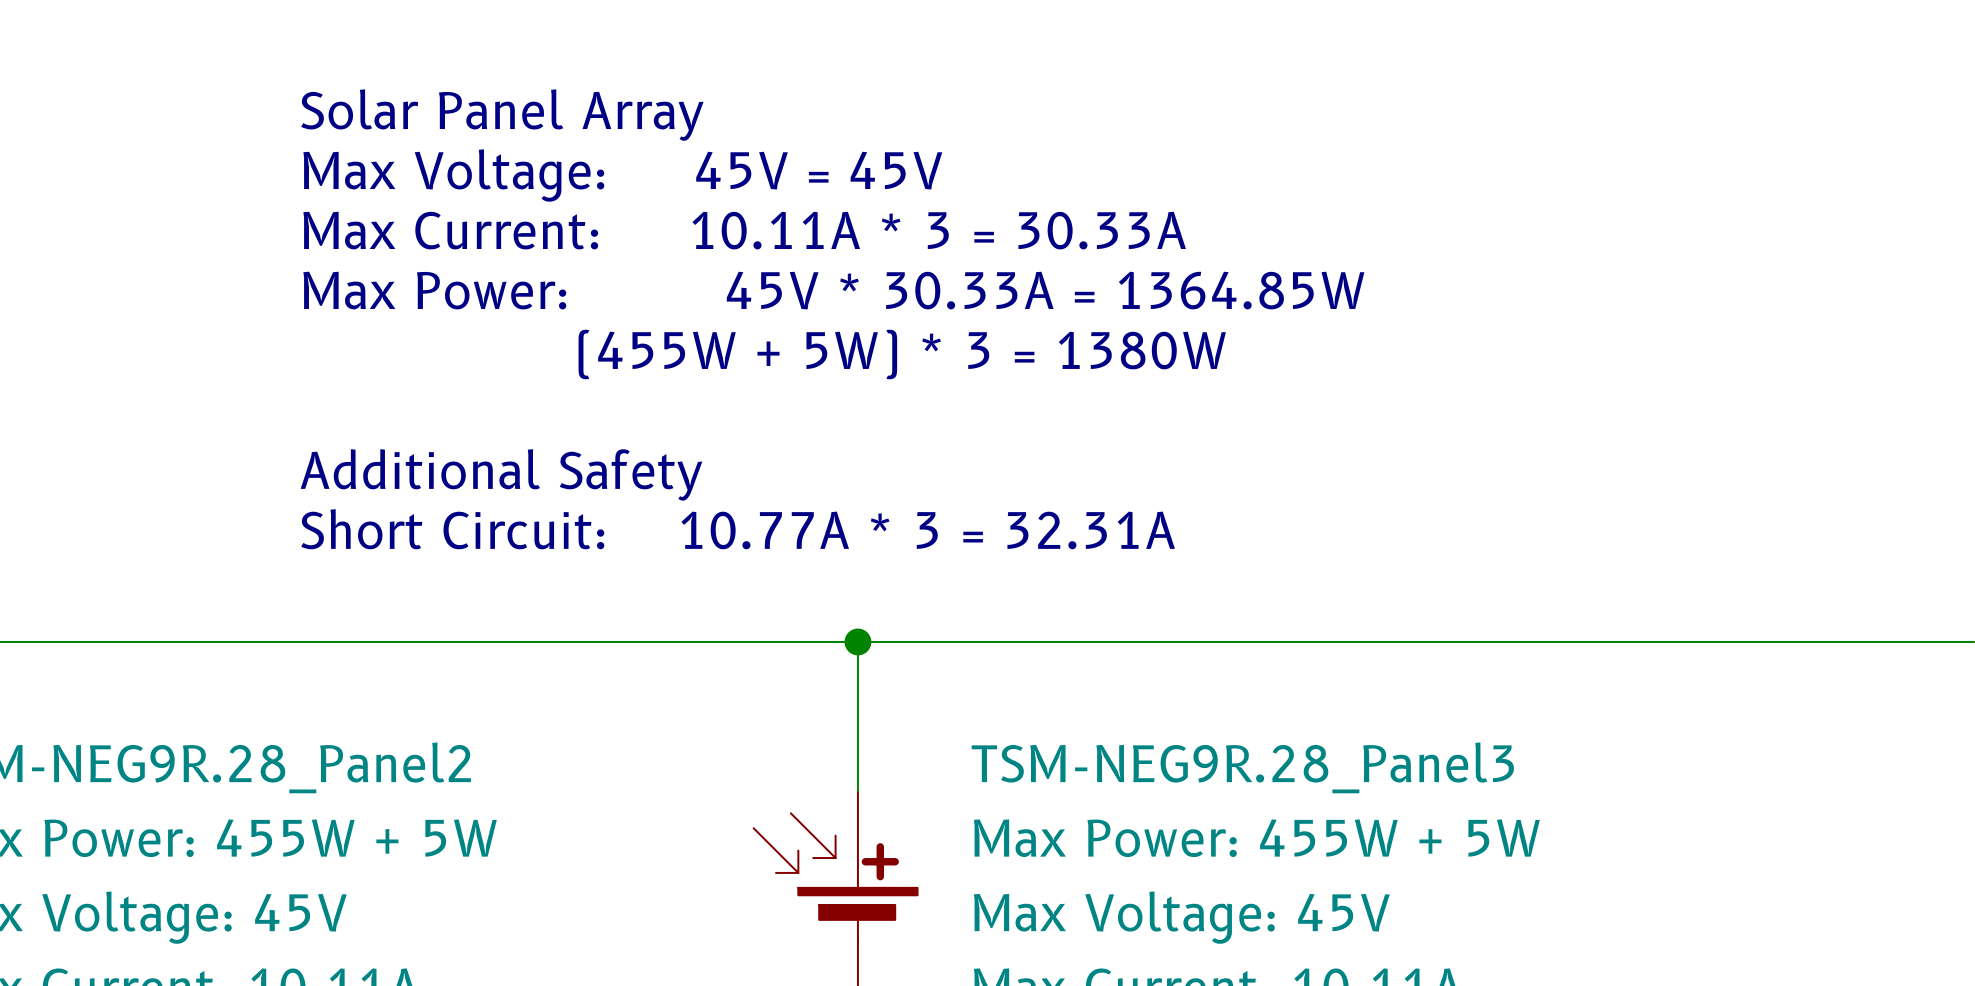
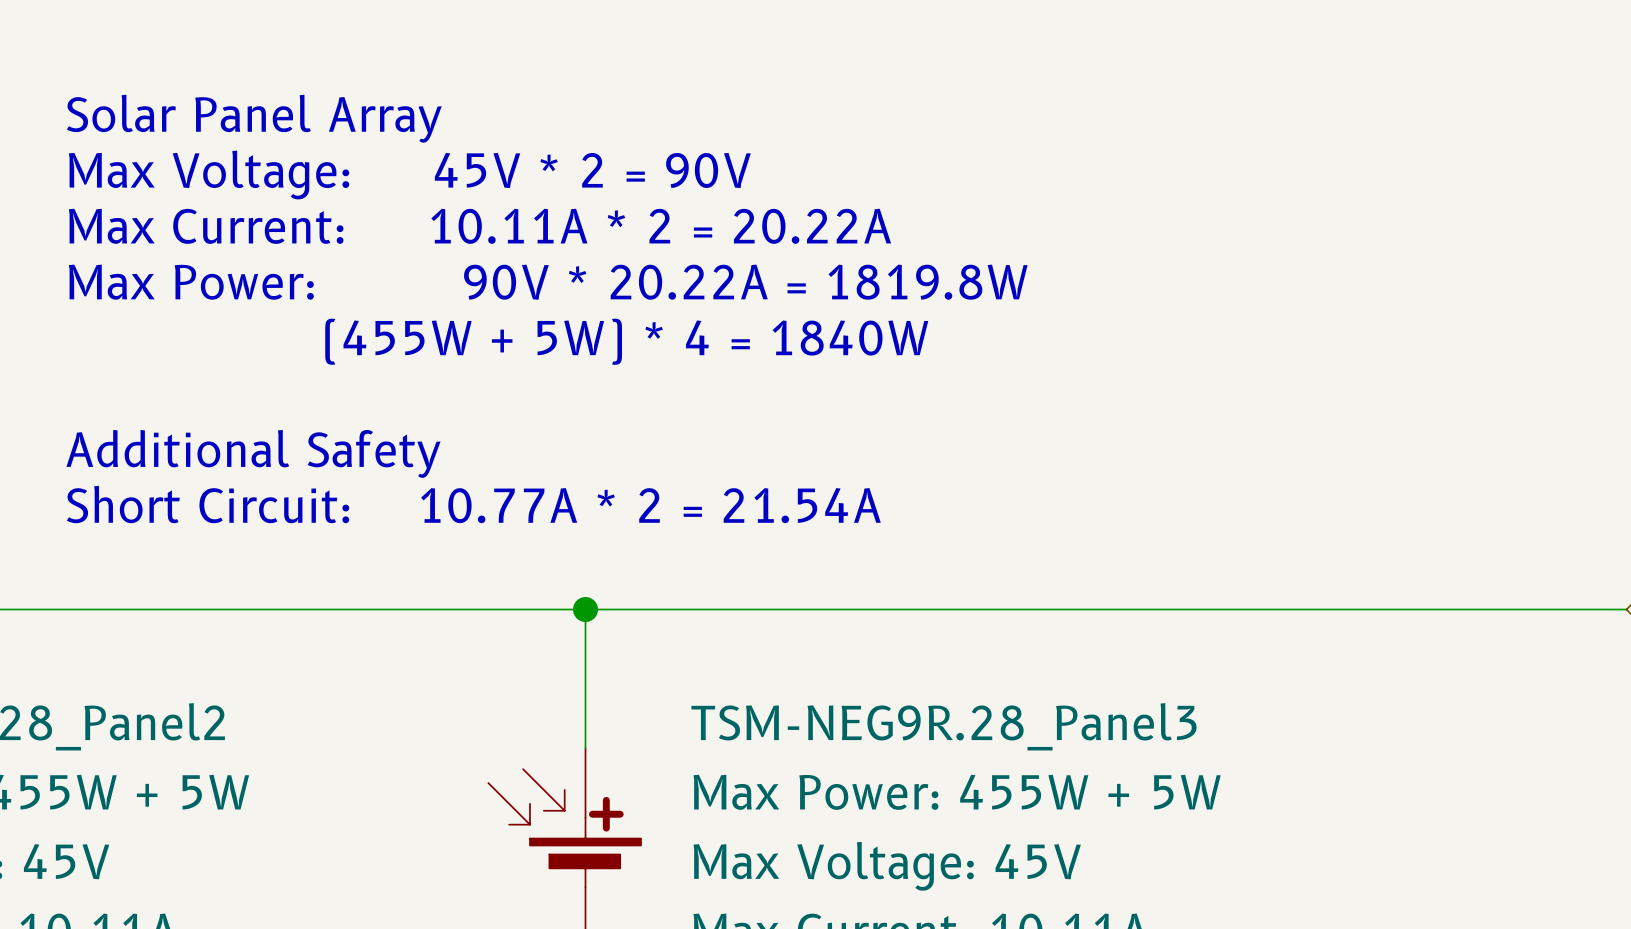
text: Max Voltage: 45V = 45V (622, 175) -> Max Voltage: 45V * 2 = 90V (409, 175)
text: Max Current: 10.11A * 3 = 30.33A (744, 230) -> Max Current: 10.11A * 2 = 20.22A (480, 226)
text: Max Power: 45V * 30.33A = 1364.85W (833, 290) -> Max Power: 90V * 20.22A = 1819.8W (548, 282)
text: (455W + 5W) * 3 = 1380W (902, 354) -> (455W + 5W) * 4 = 1840W (626, 341)
text: Short Circuit: 10.77A * 3 = 32.31A (738, 529) -> Short Circuit: 10.77A * 2 = 21.54A (473, 504)

